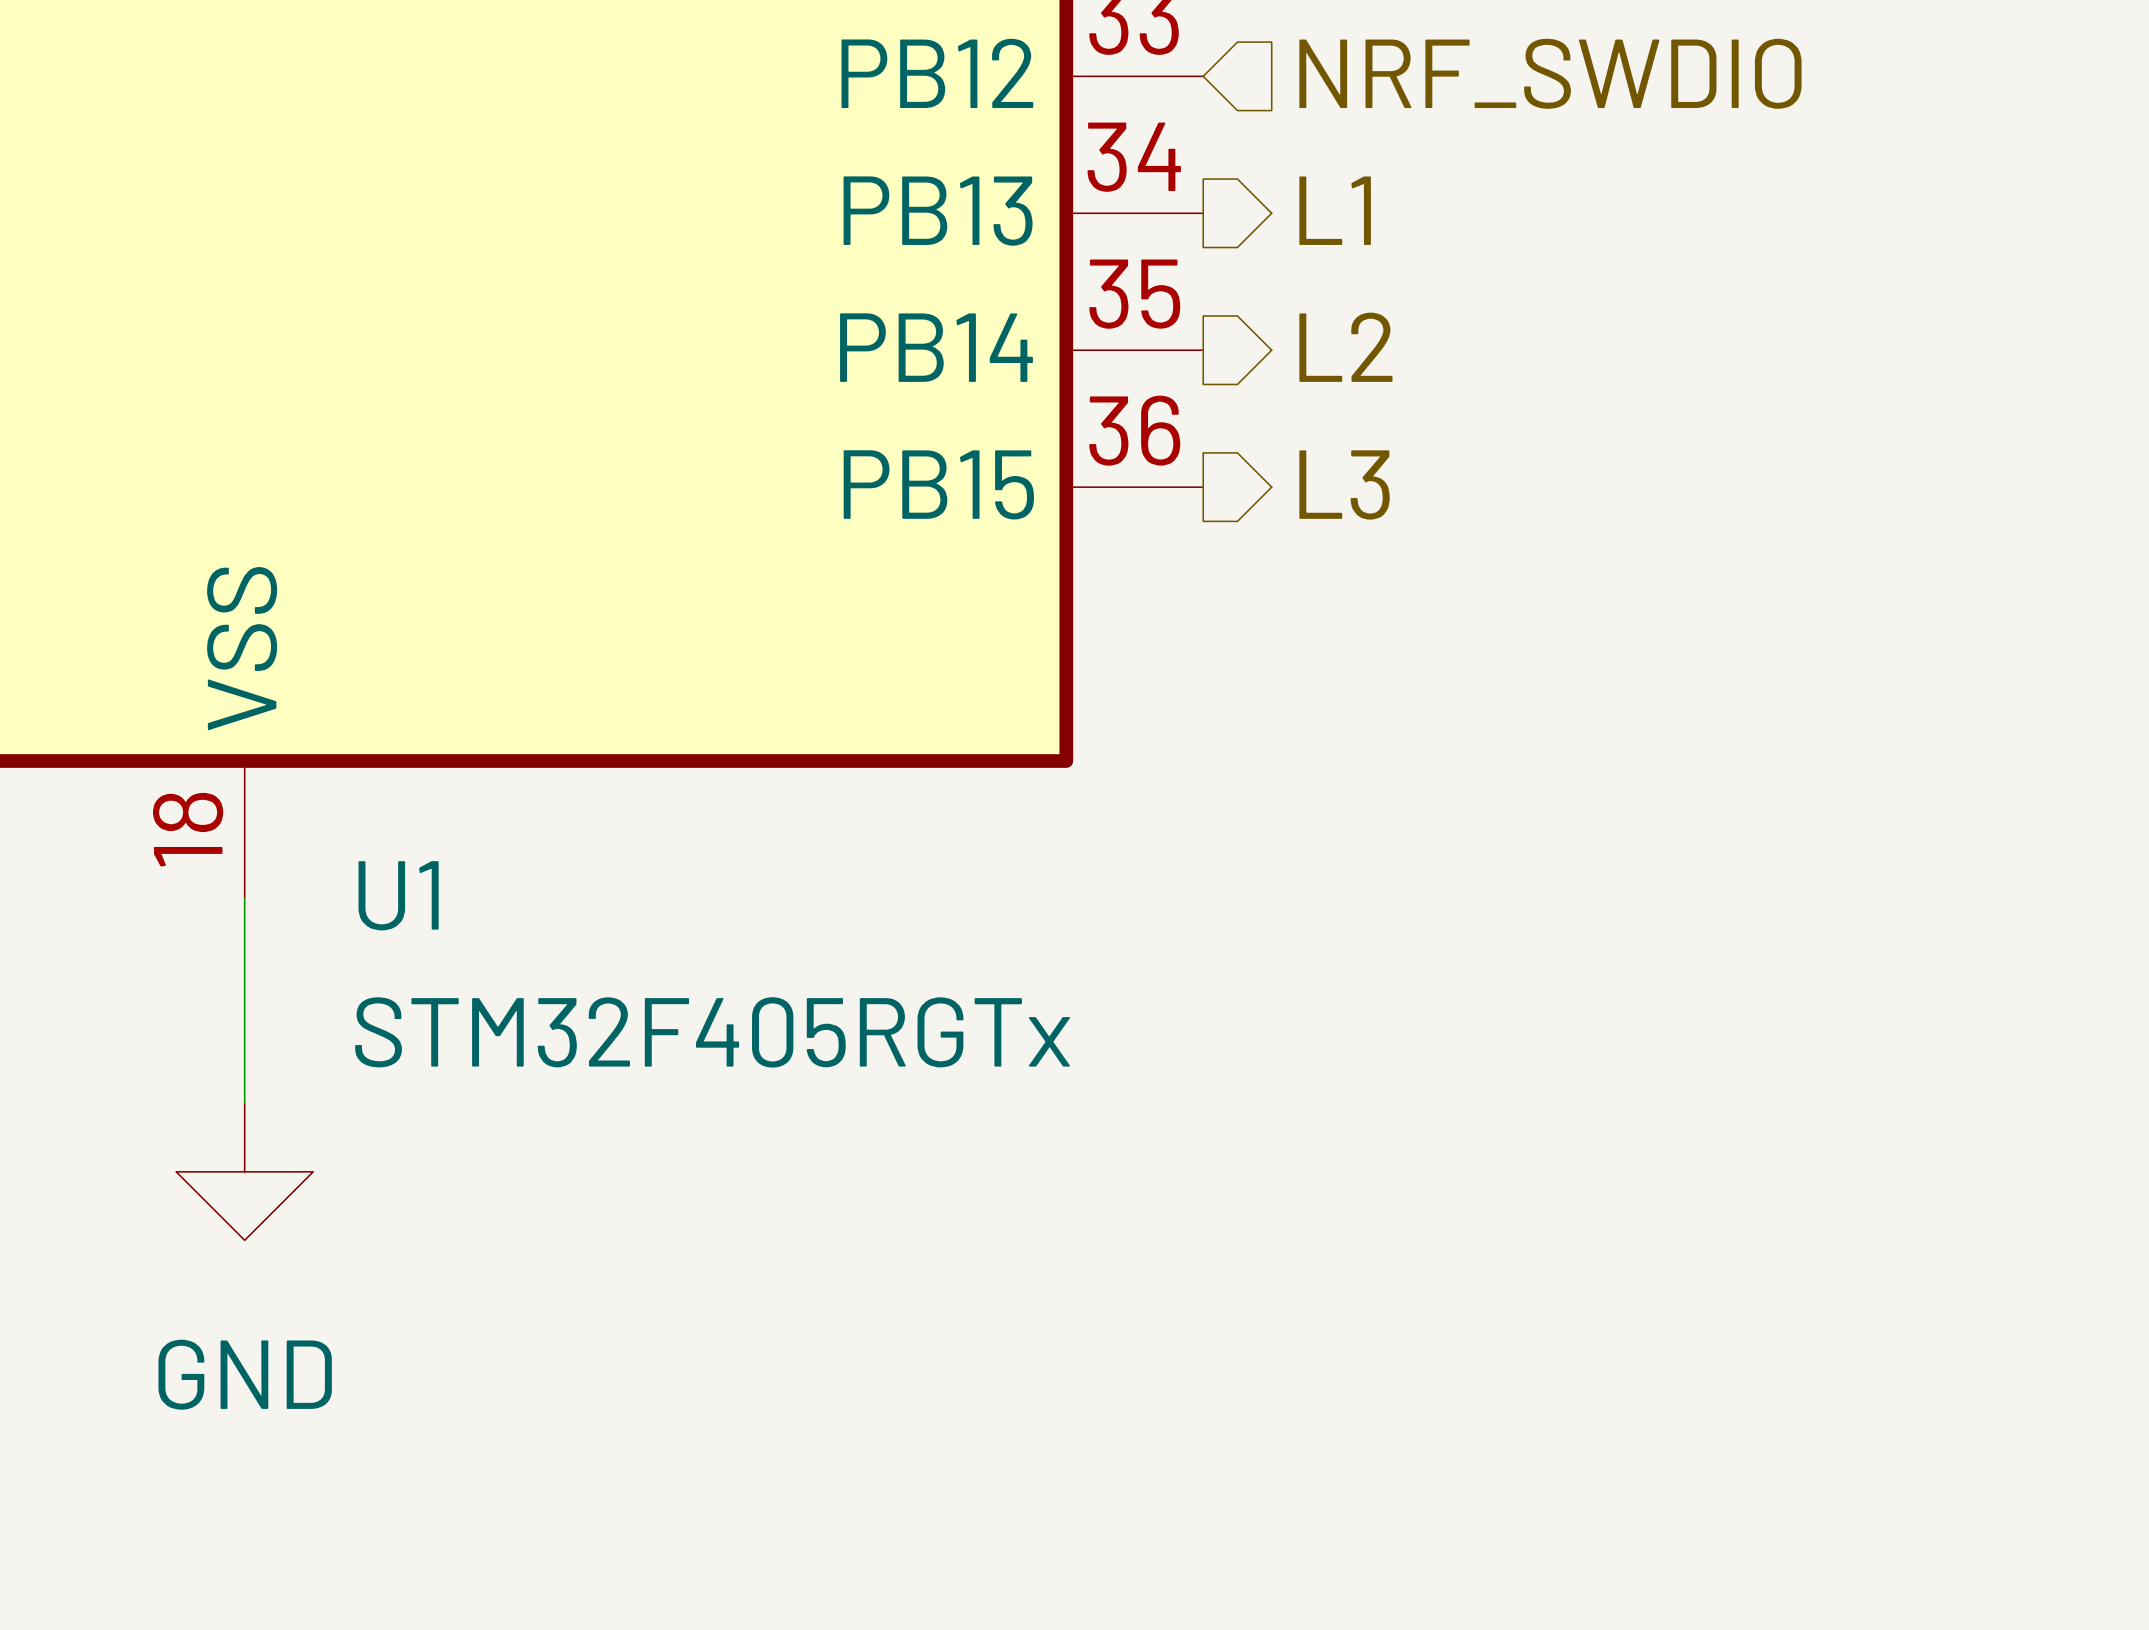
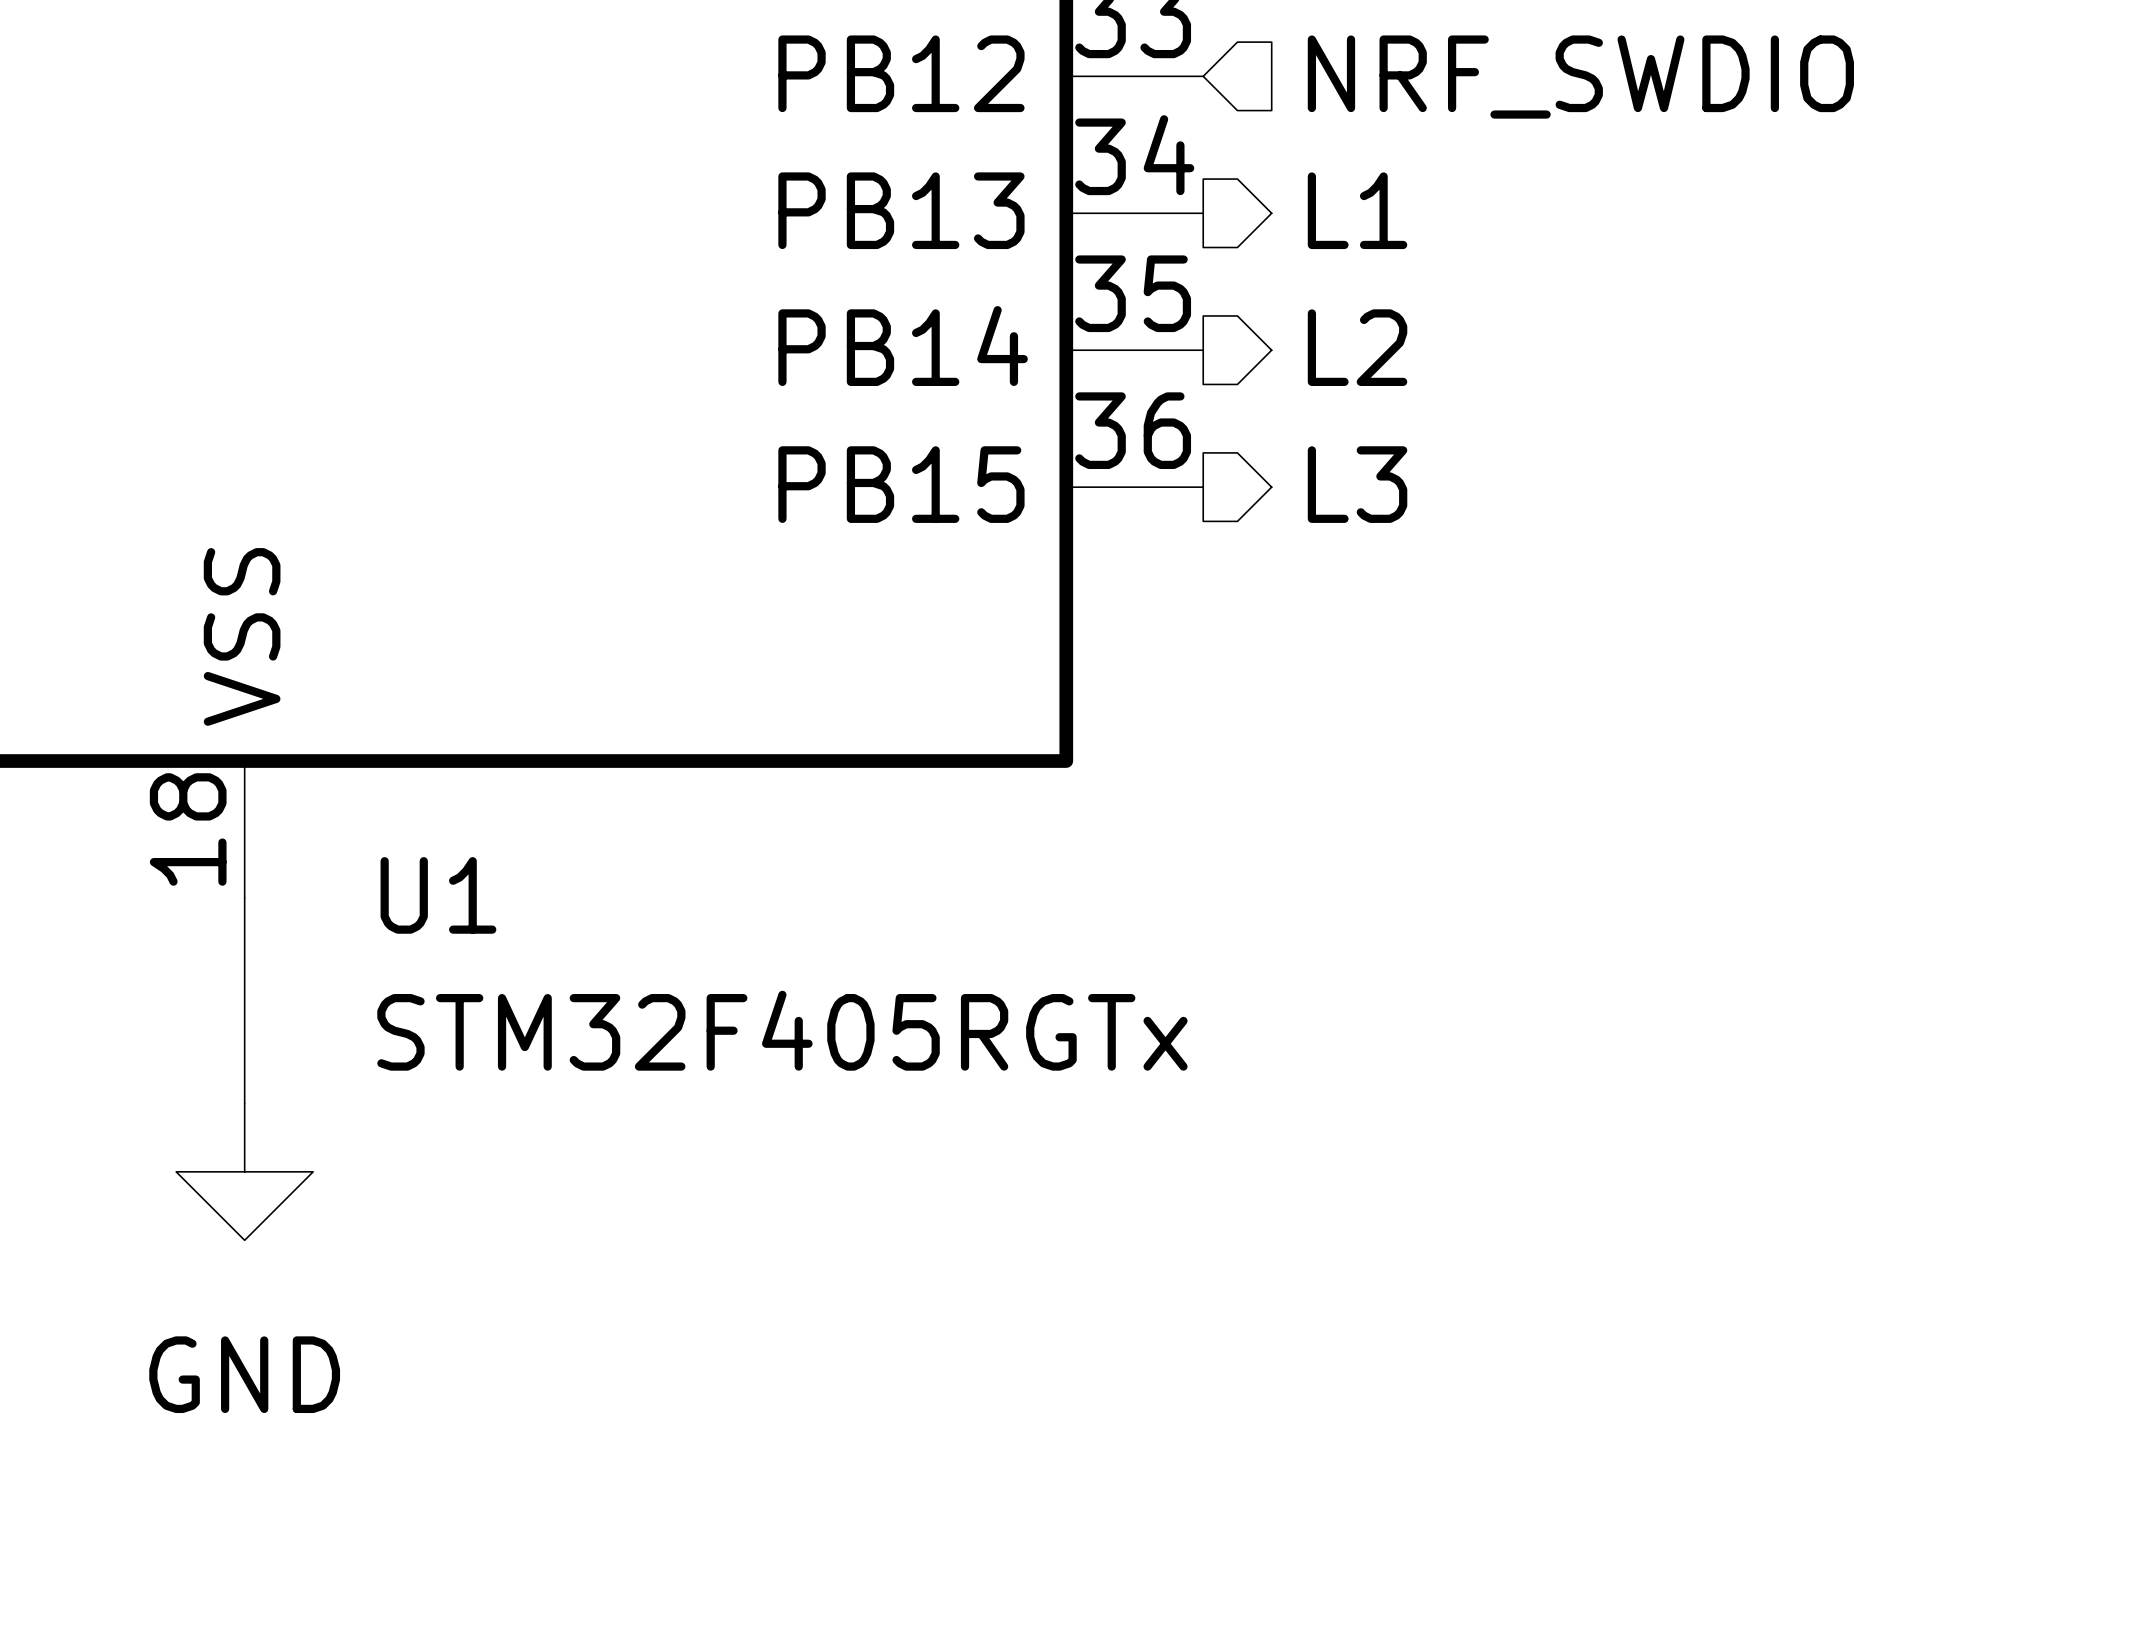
U1 name position: U1 (398, 895) -> U1 (438, 895)
U1 value position: STM32F405RGTx (712, 1032) -> STM32F405RGTx (782, 1030)

